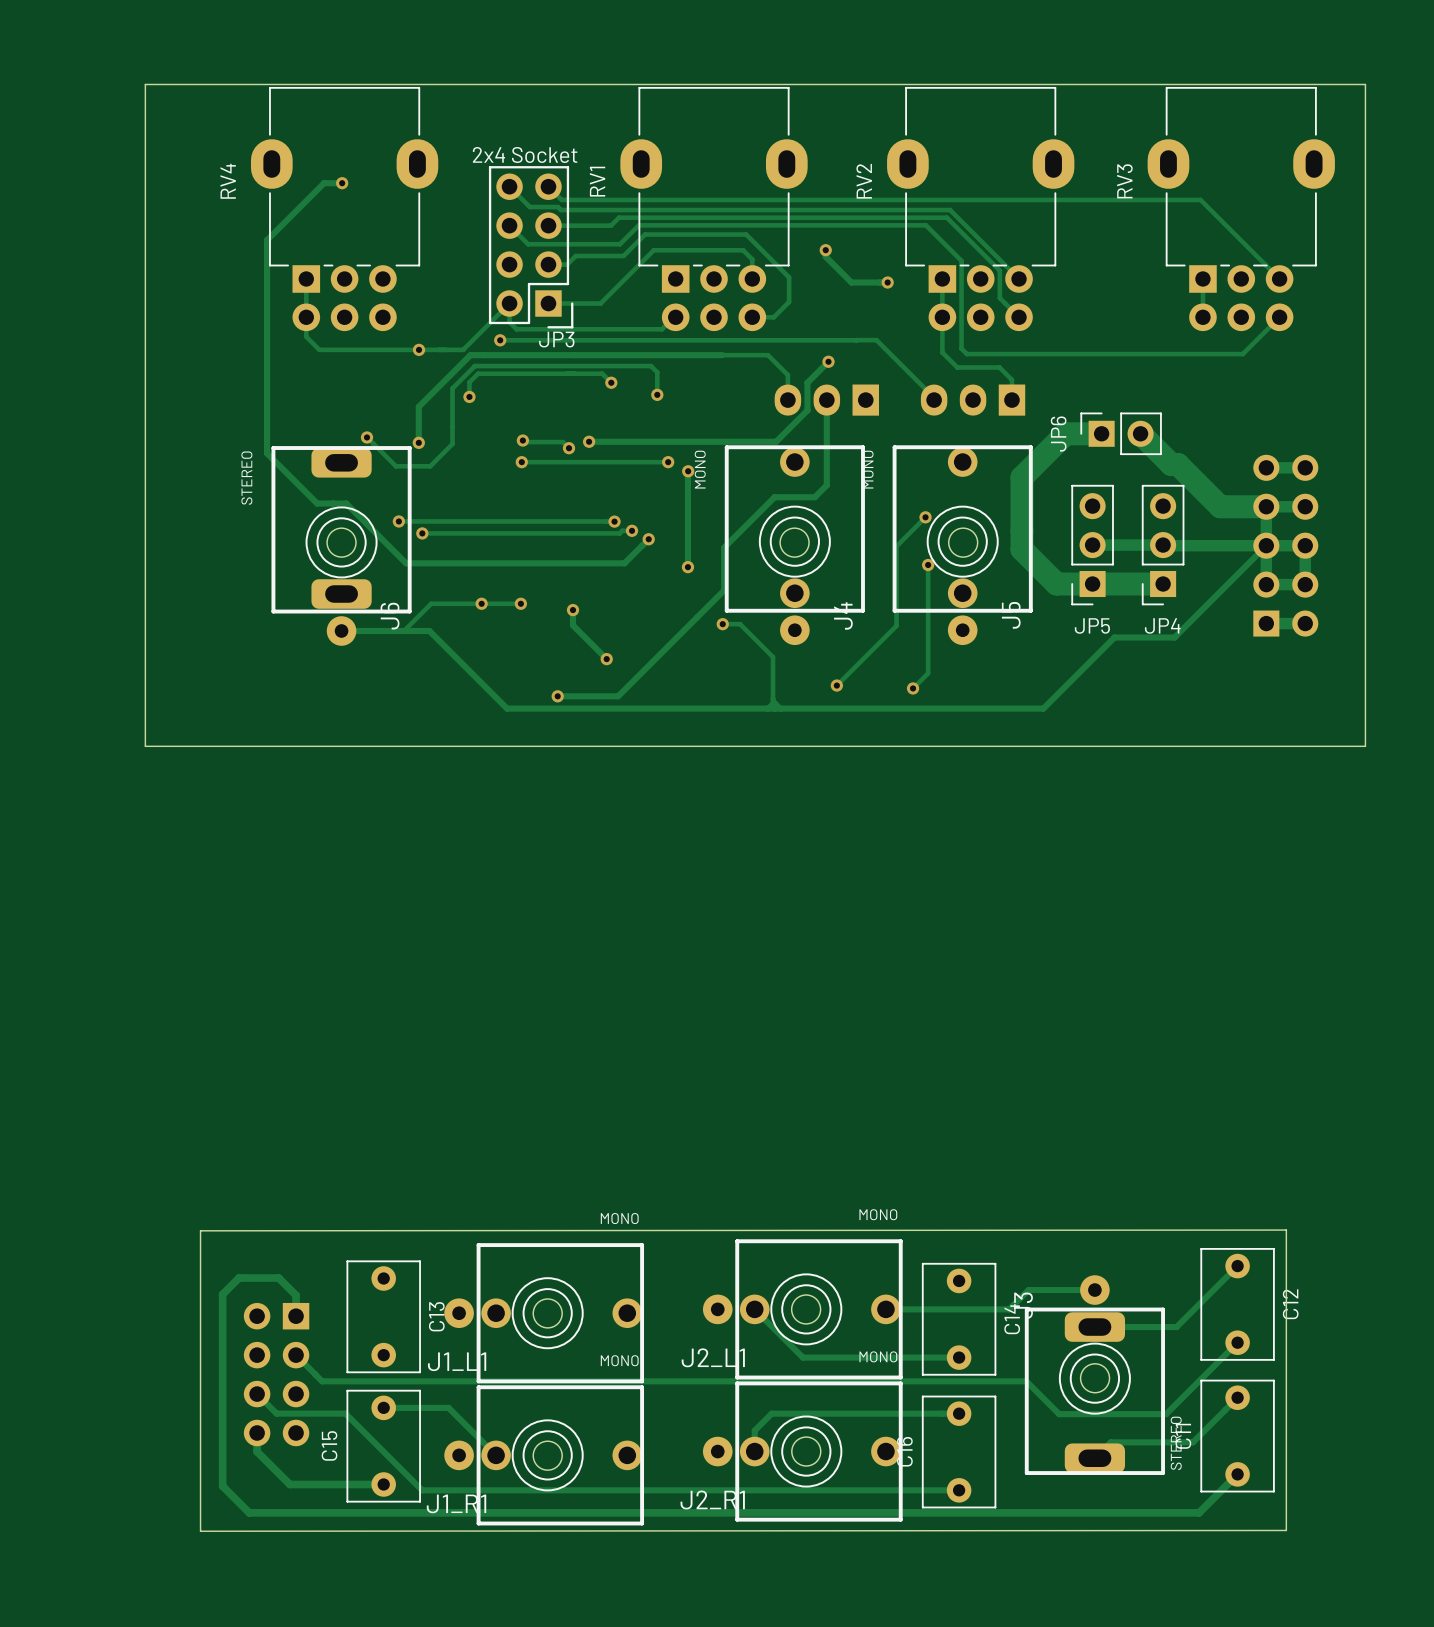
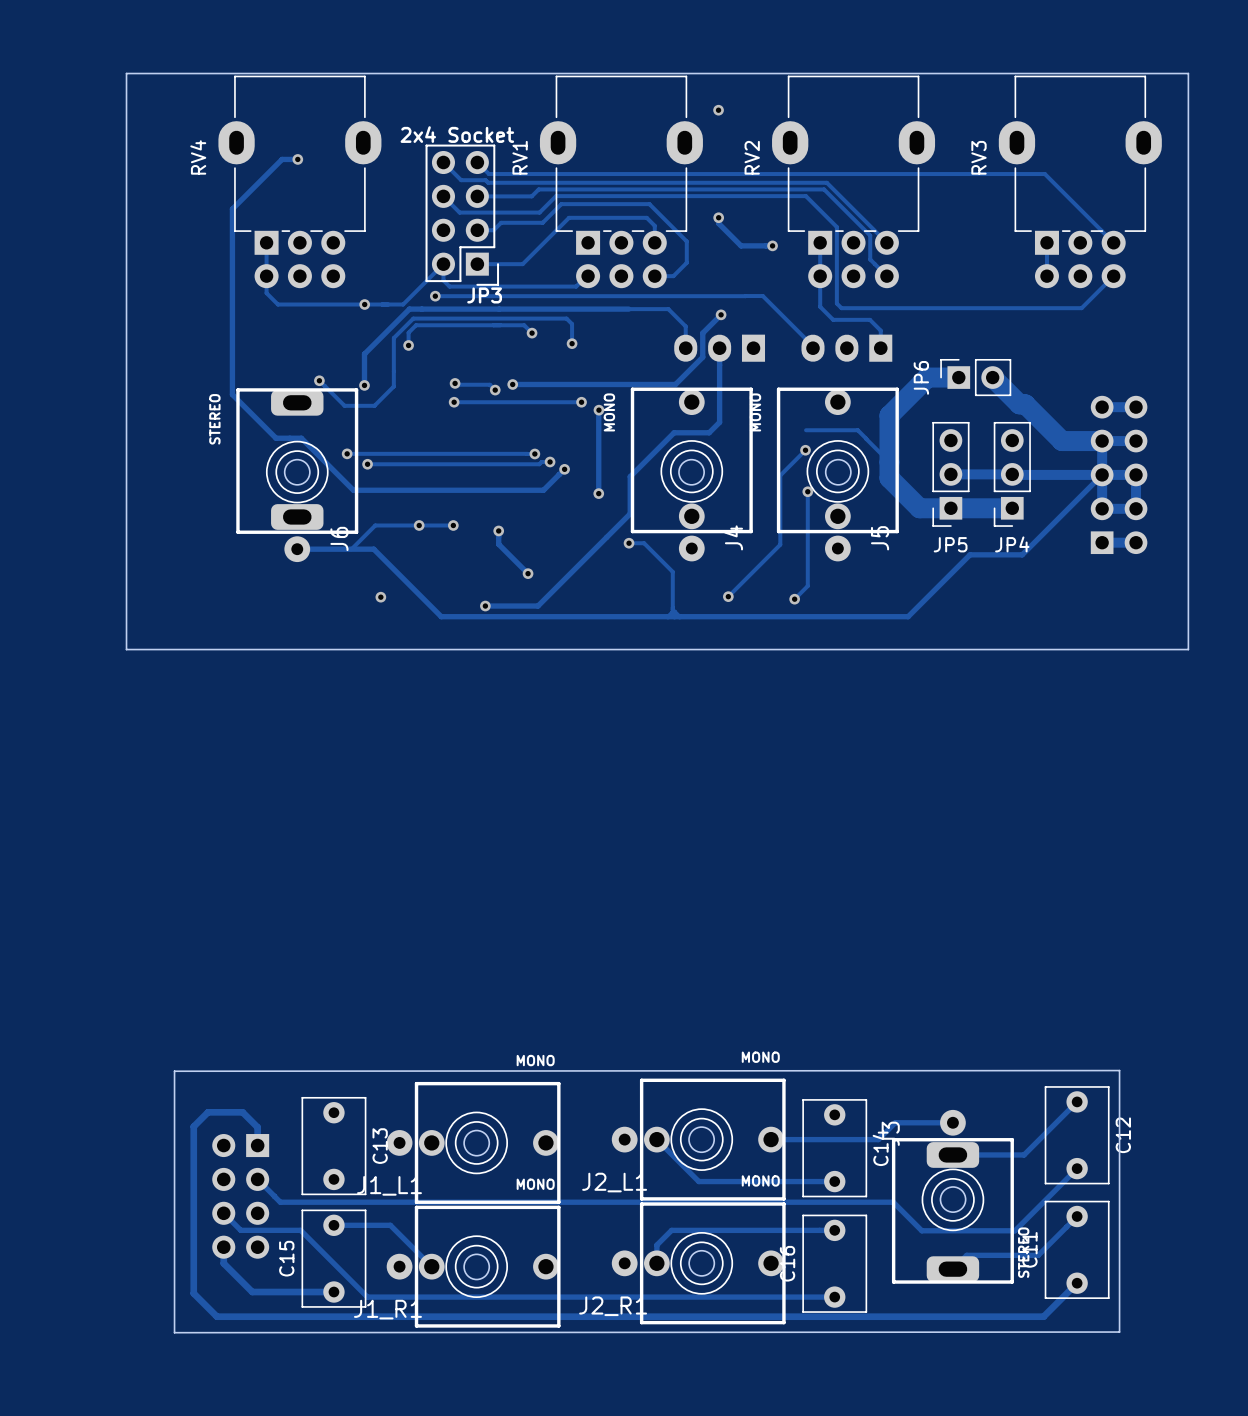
via: none -> (718, 110)
track: none -> (806, 430) (857, 430) (866, 438)
track: none -> (866, 438) (889, 462)
via: none -> (380, 597)

